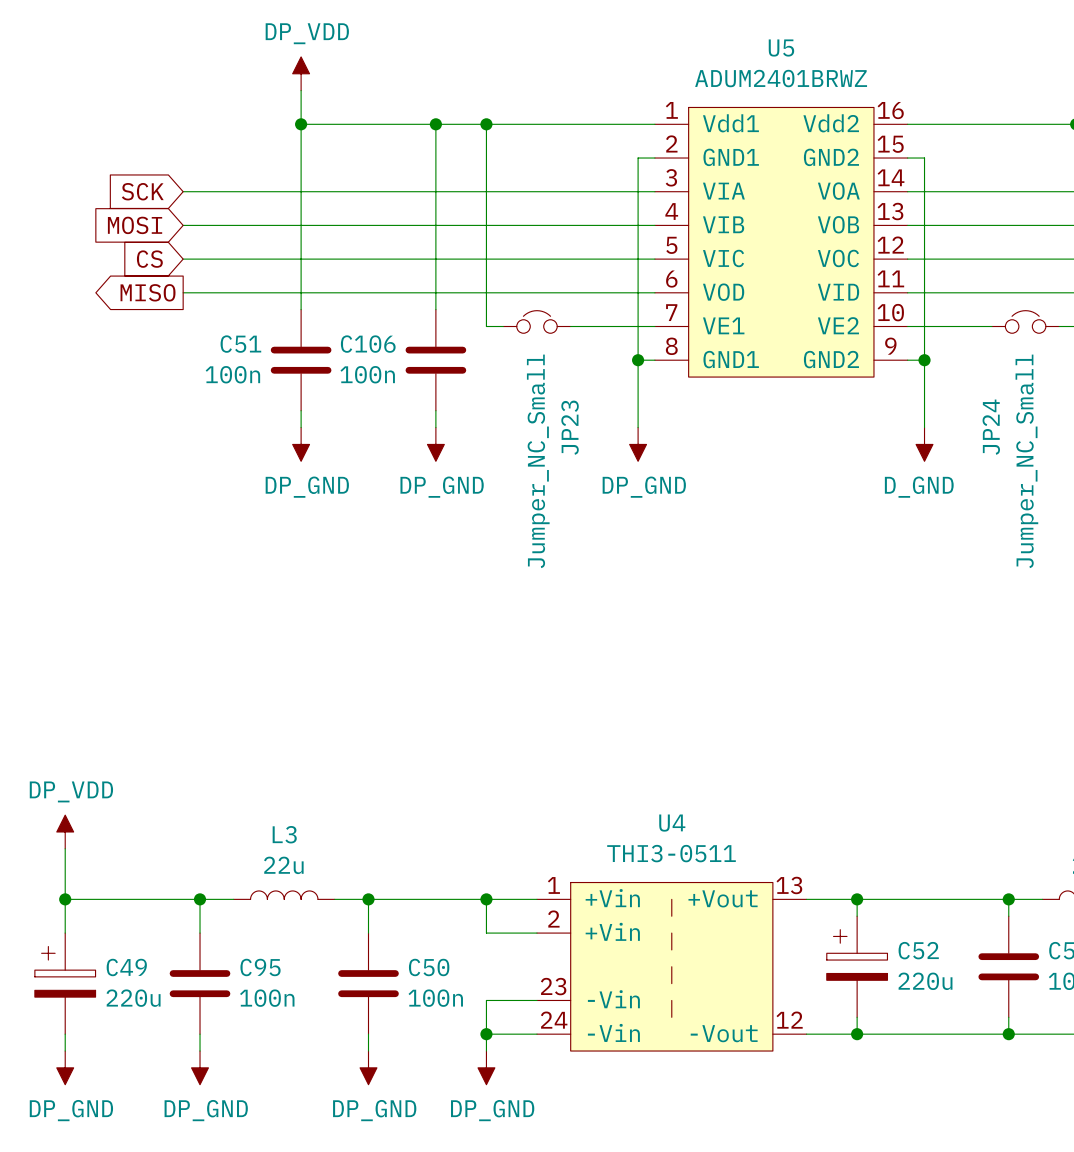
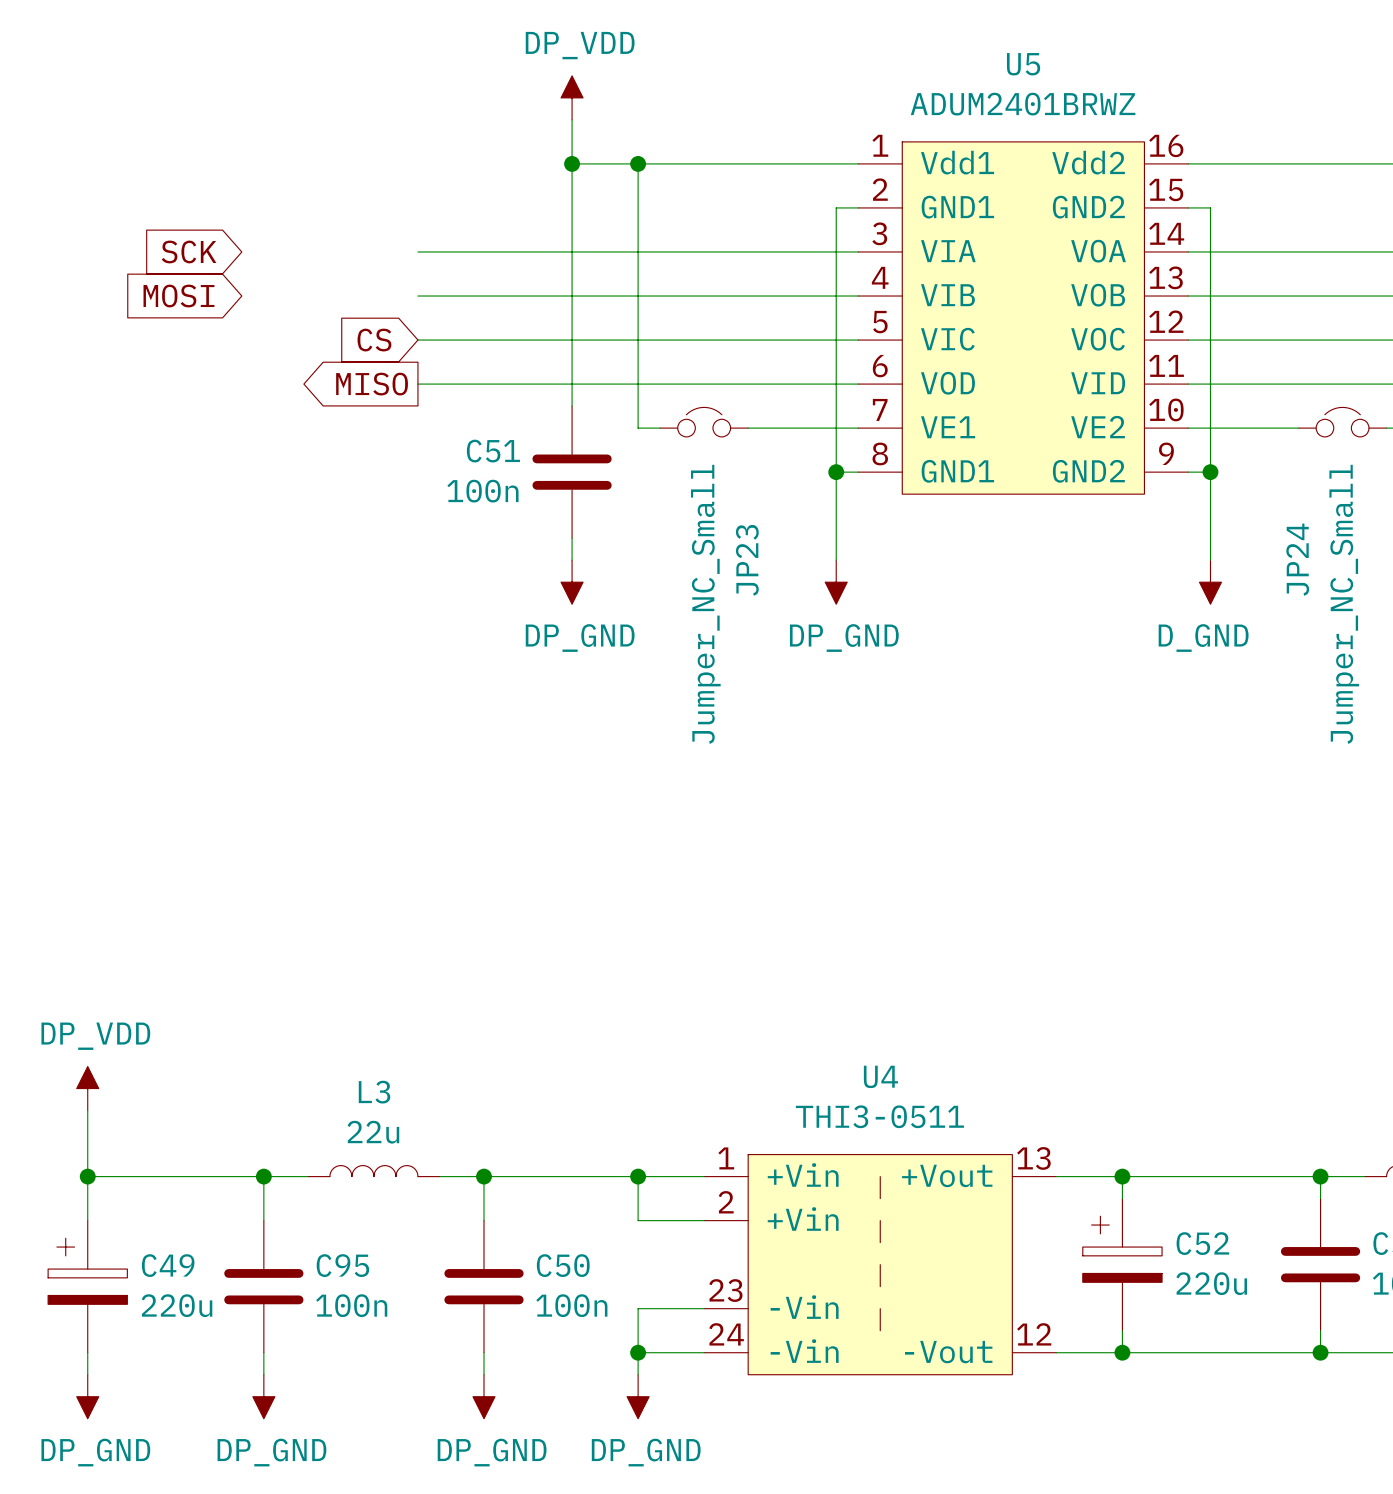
power symbol position: DP_VDD (301, 73) -> DP_VDD (572, 97)
wire: (301, 90) (301, 309) -> none
wire: (301, 124) (435, 124) -> (572, 119) (572, 163)
junction: (301, 124) -> none
wire: (183, 191) (317, 191) -> none
wire: (183, 225) (317, 225) -> none
global label position: CS (149, 259) -> CS (374, 340)
wire: (183, 259) (317, 259) -> none
global label position: MISO (148, 292) -> MISO (372, 384)
wire: (183, 292) (317, 292) -> none
C106 name: C106 (368, 344) -> C51 (493, 451)
C51: 100n (301, 360) -> none
wire: (301, 410) (301, 427) -> none
power symbol: DP_GND (301, 444) -> none

